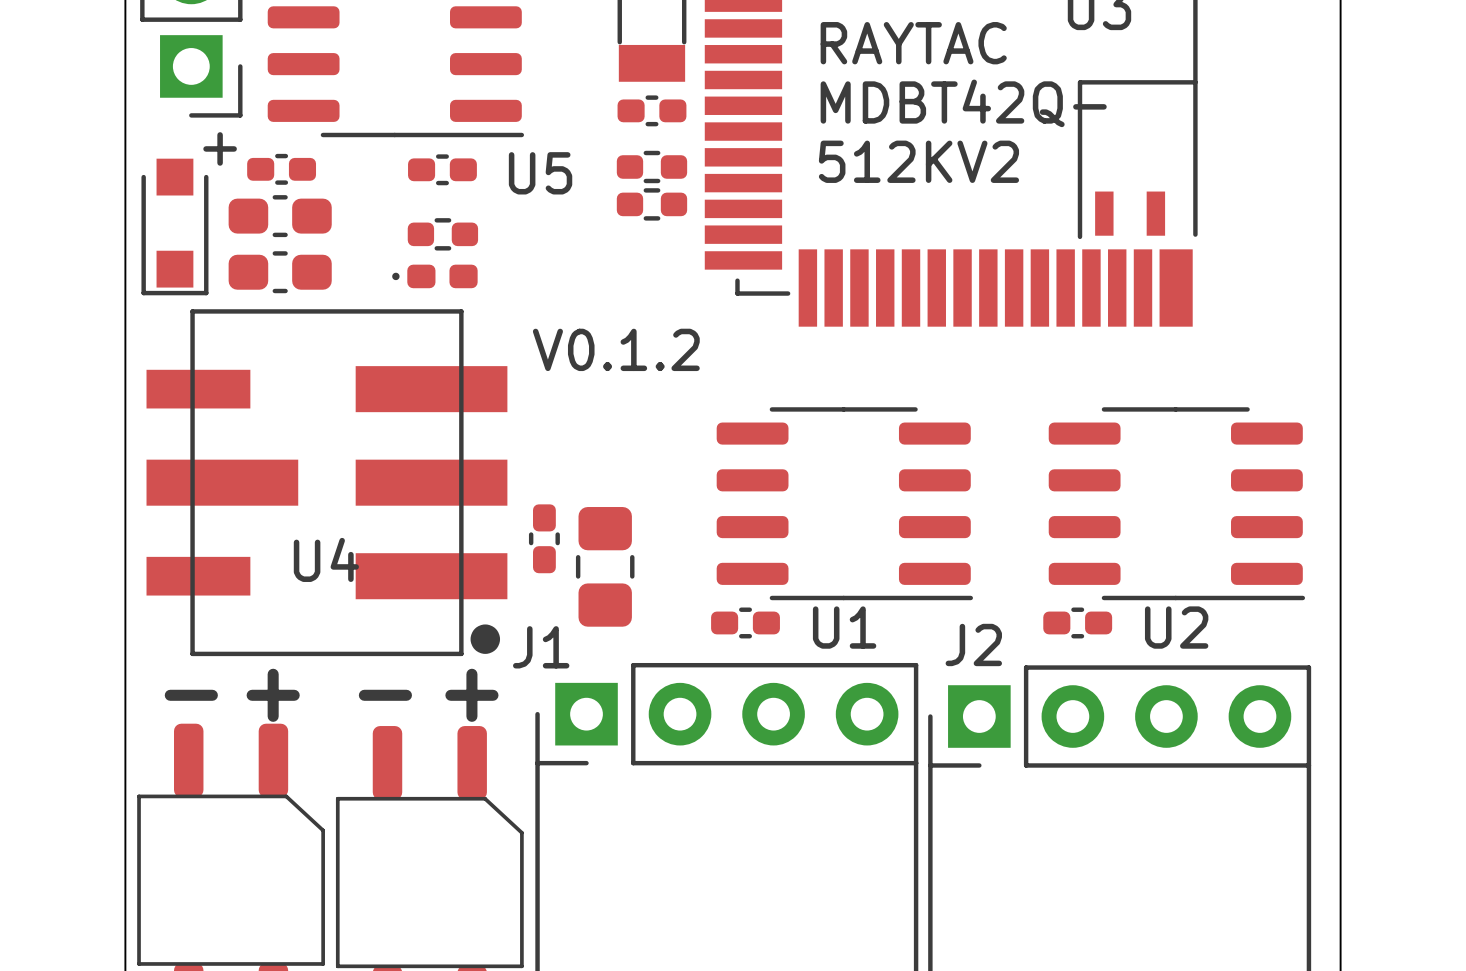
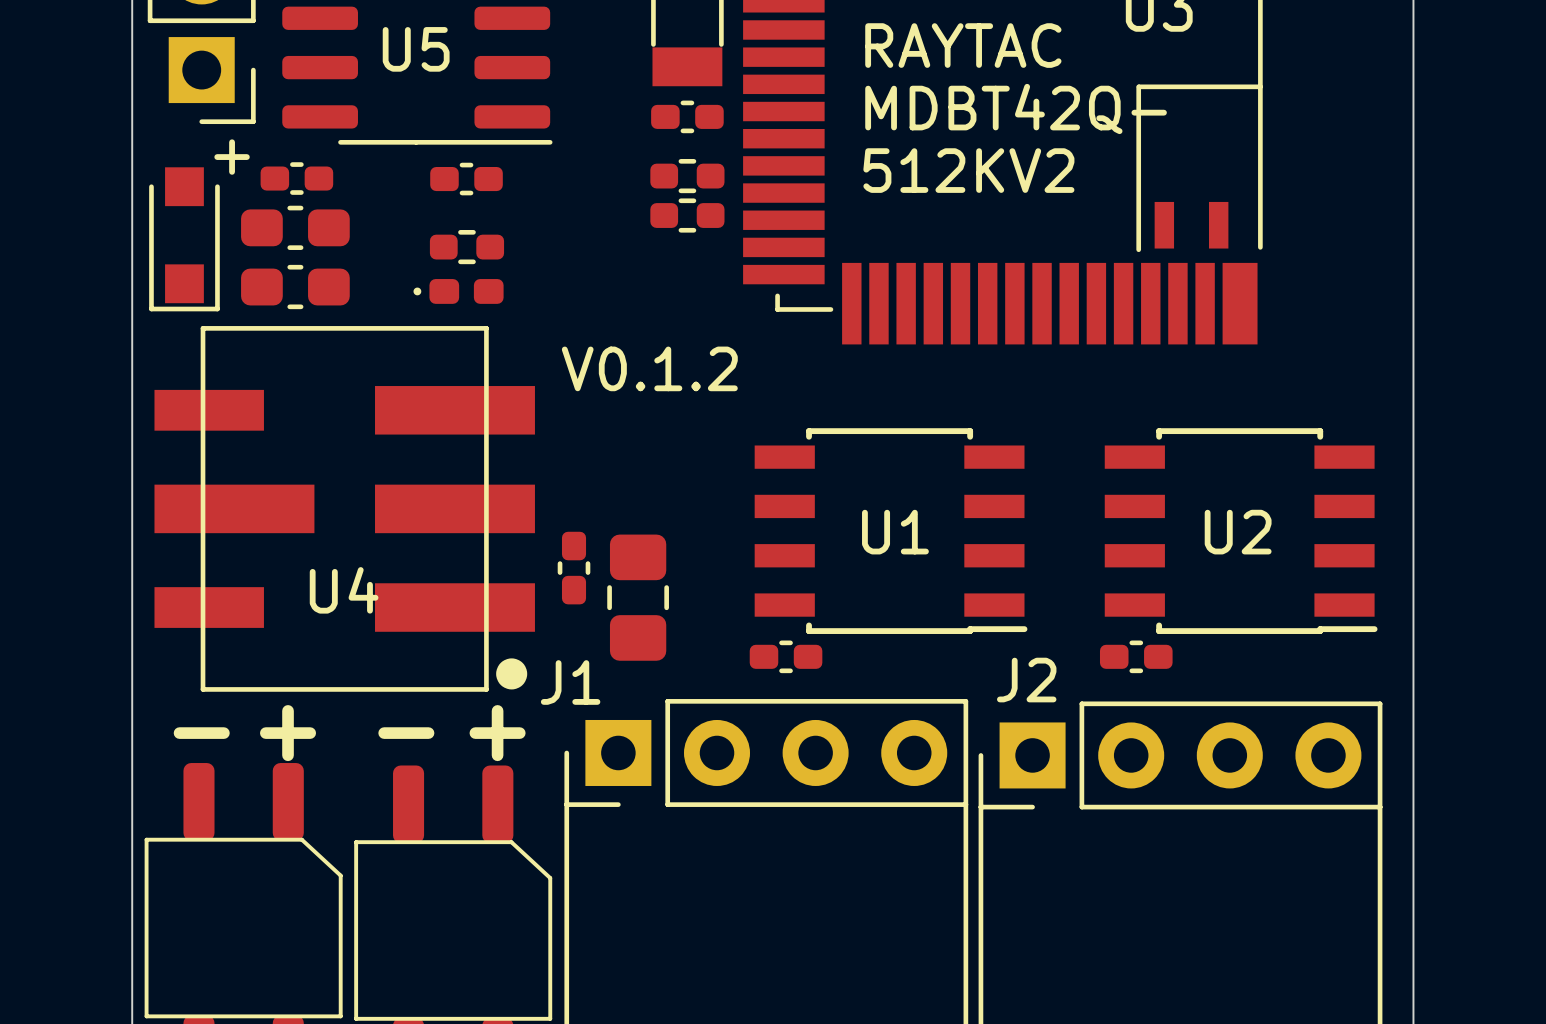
U5 name position: U5 (540, 173) -> U5 (416, 49)
U1 footprint: [716, 407, 973, 601] -> [754, 428, 1028, 634]
U2 footprint: [1048, 407, 1306, 601] -> [1104, 428, 1378, 634]
U1 name position: U1 (844, 627) -> U1 (895, 532)
U2 name position: U2 (1176, 627) -> U2 (1238, 532)

